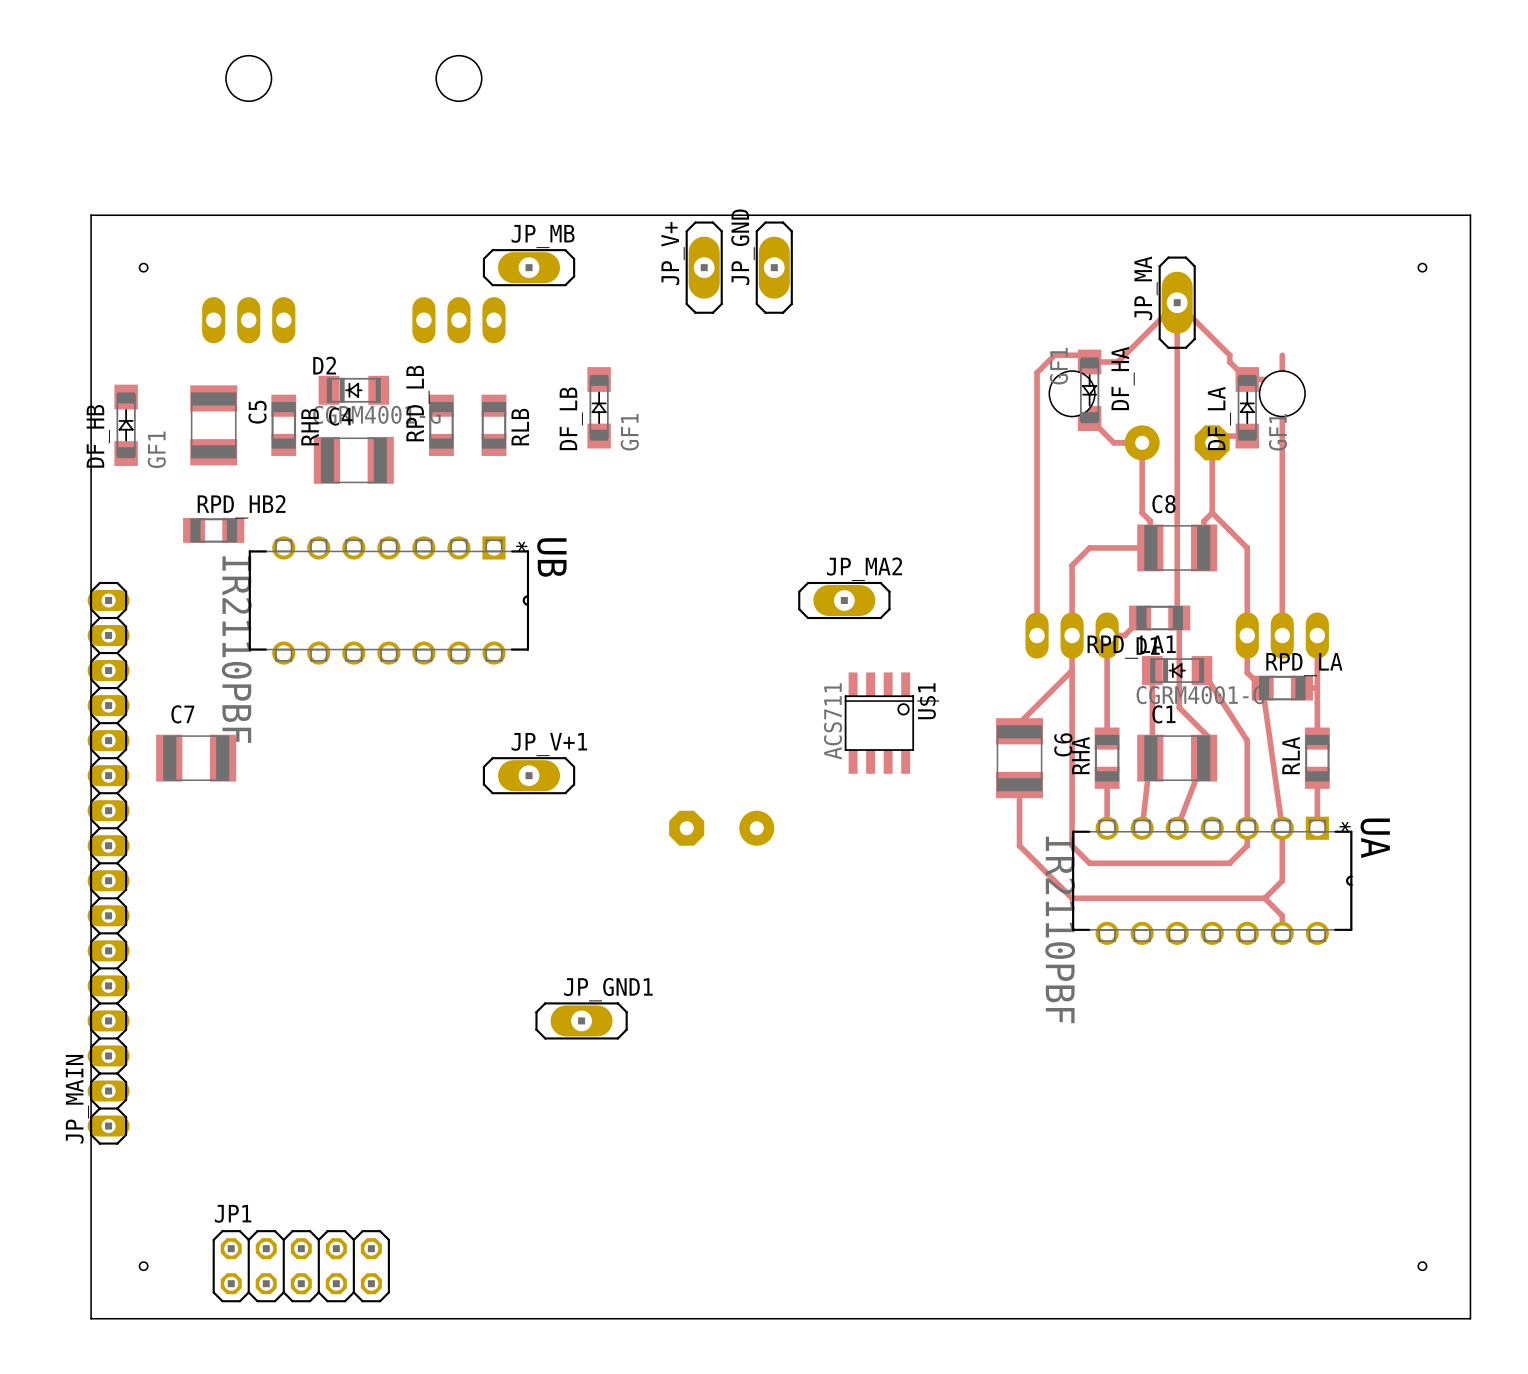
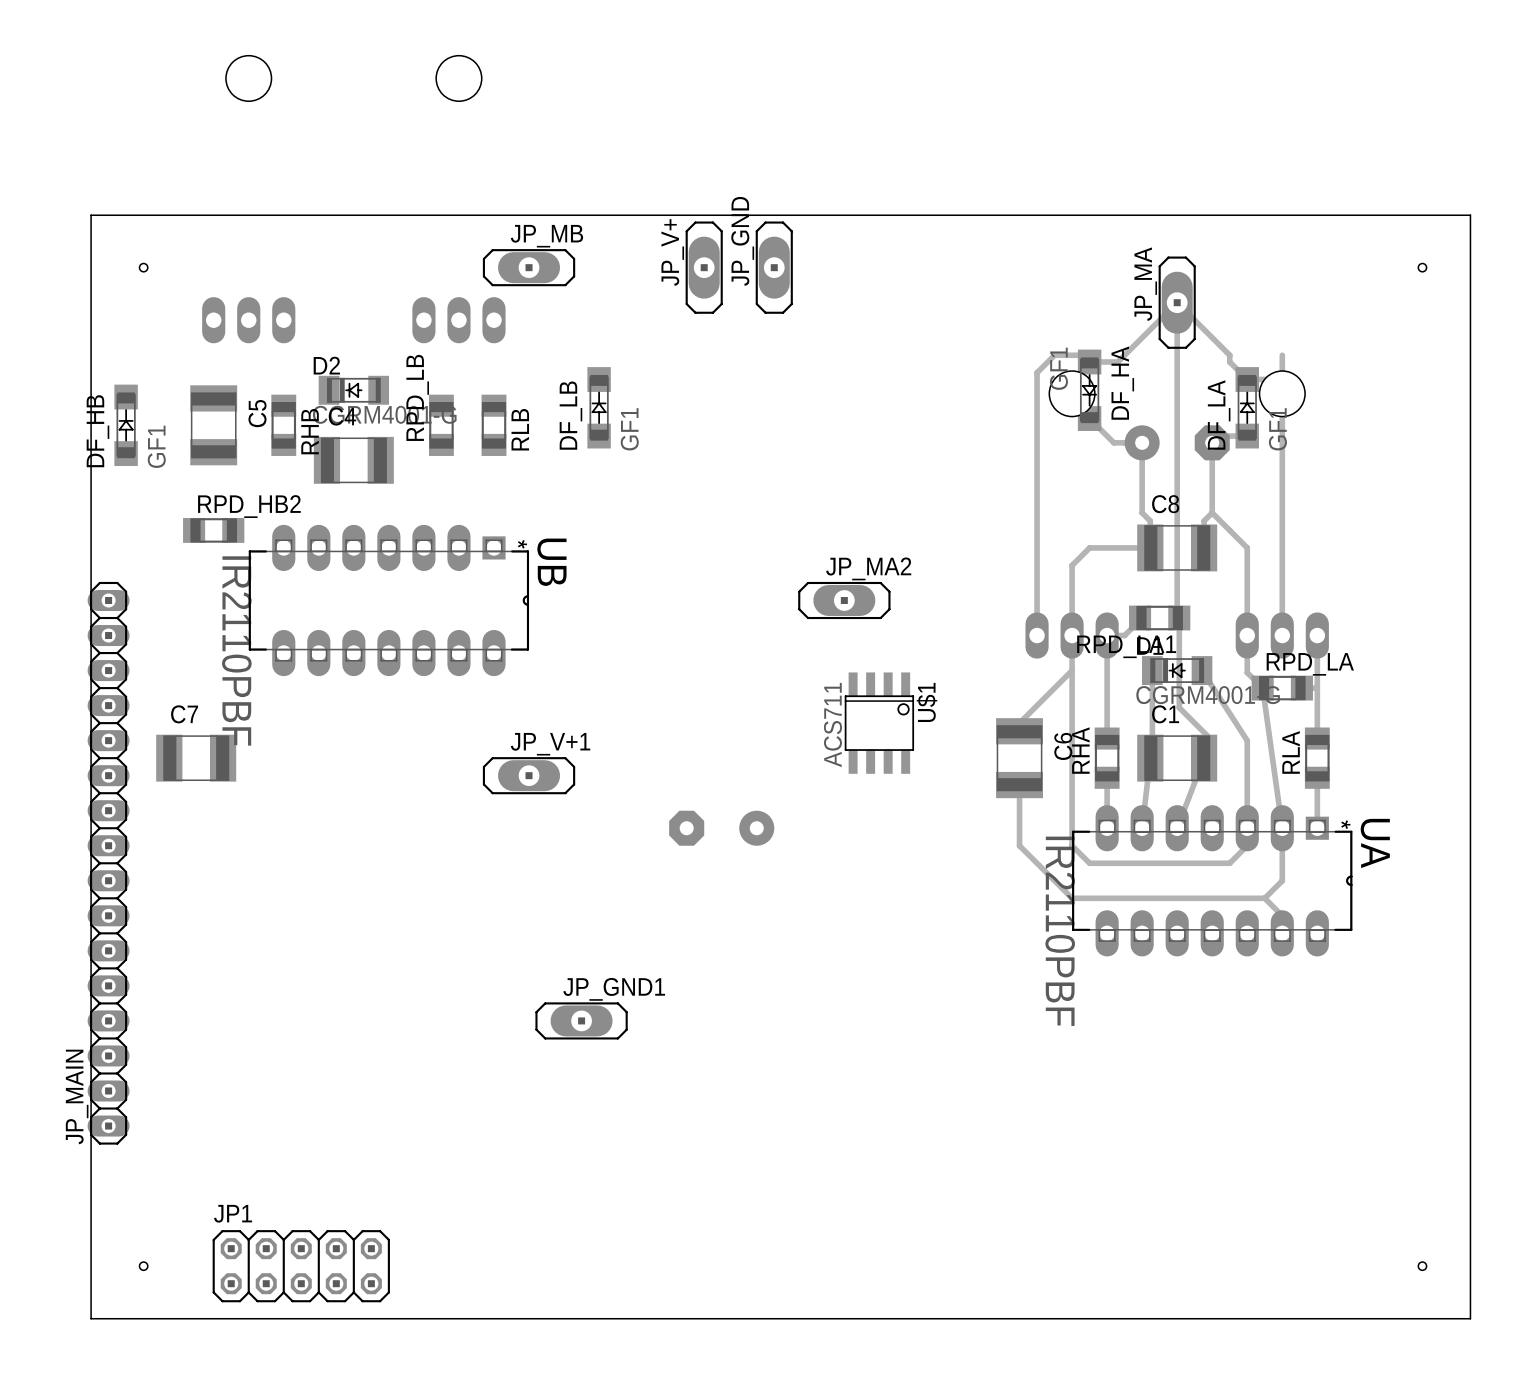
UB footprint: [248, 536, 530, 665] -> [248, 524, 530, 677]
UA footprint: [1072, 816, 1353, 945] -> [1072, 805, 1353, 957]

